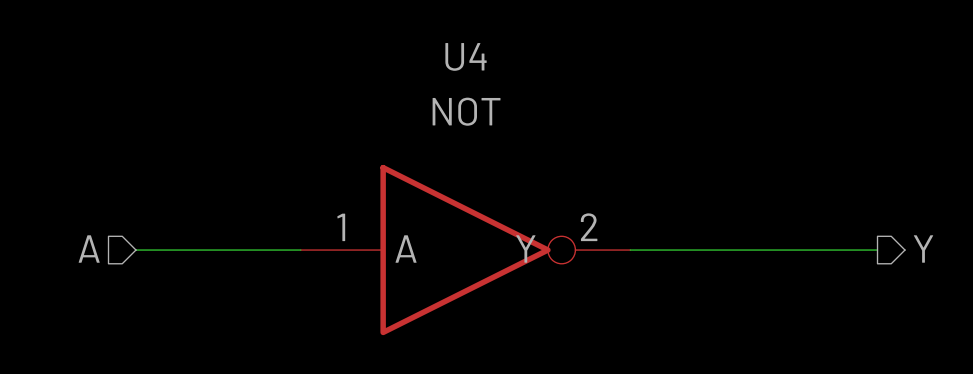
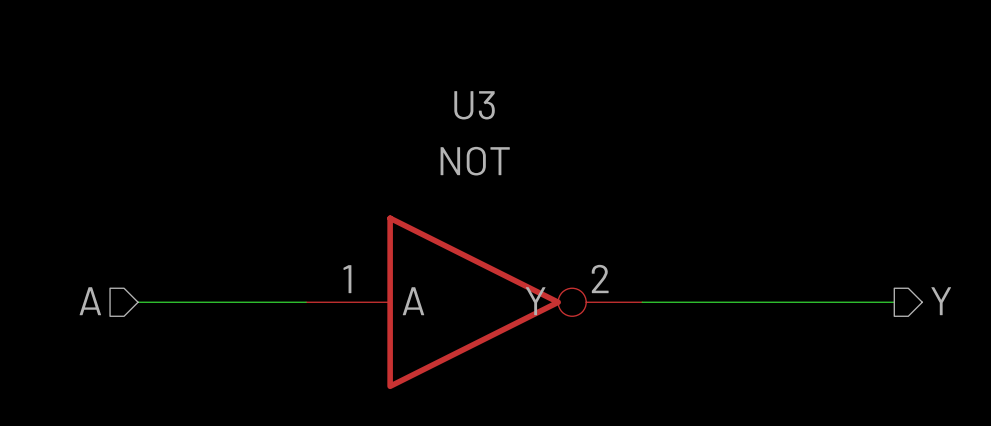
U4 name: U4 (466, 56) -> U3 (474, 105)

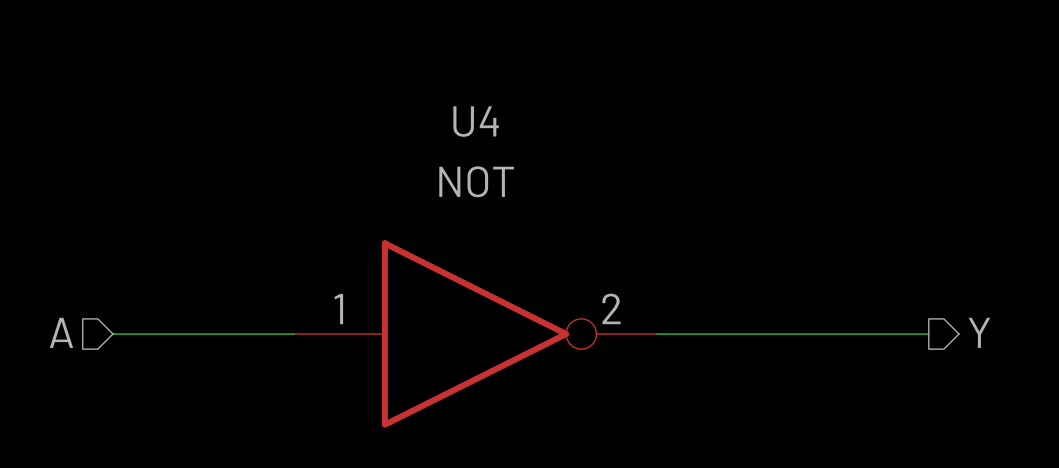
U3 name: U3 (474, 105) -> U4 (476, 121)
U3 pin name: A (413, 301) -> none
U3 pin name: Y (535, 301) -> none

